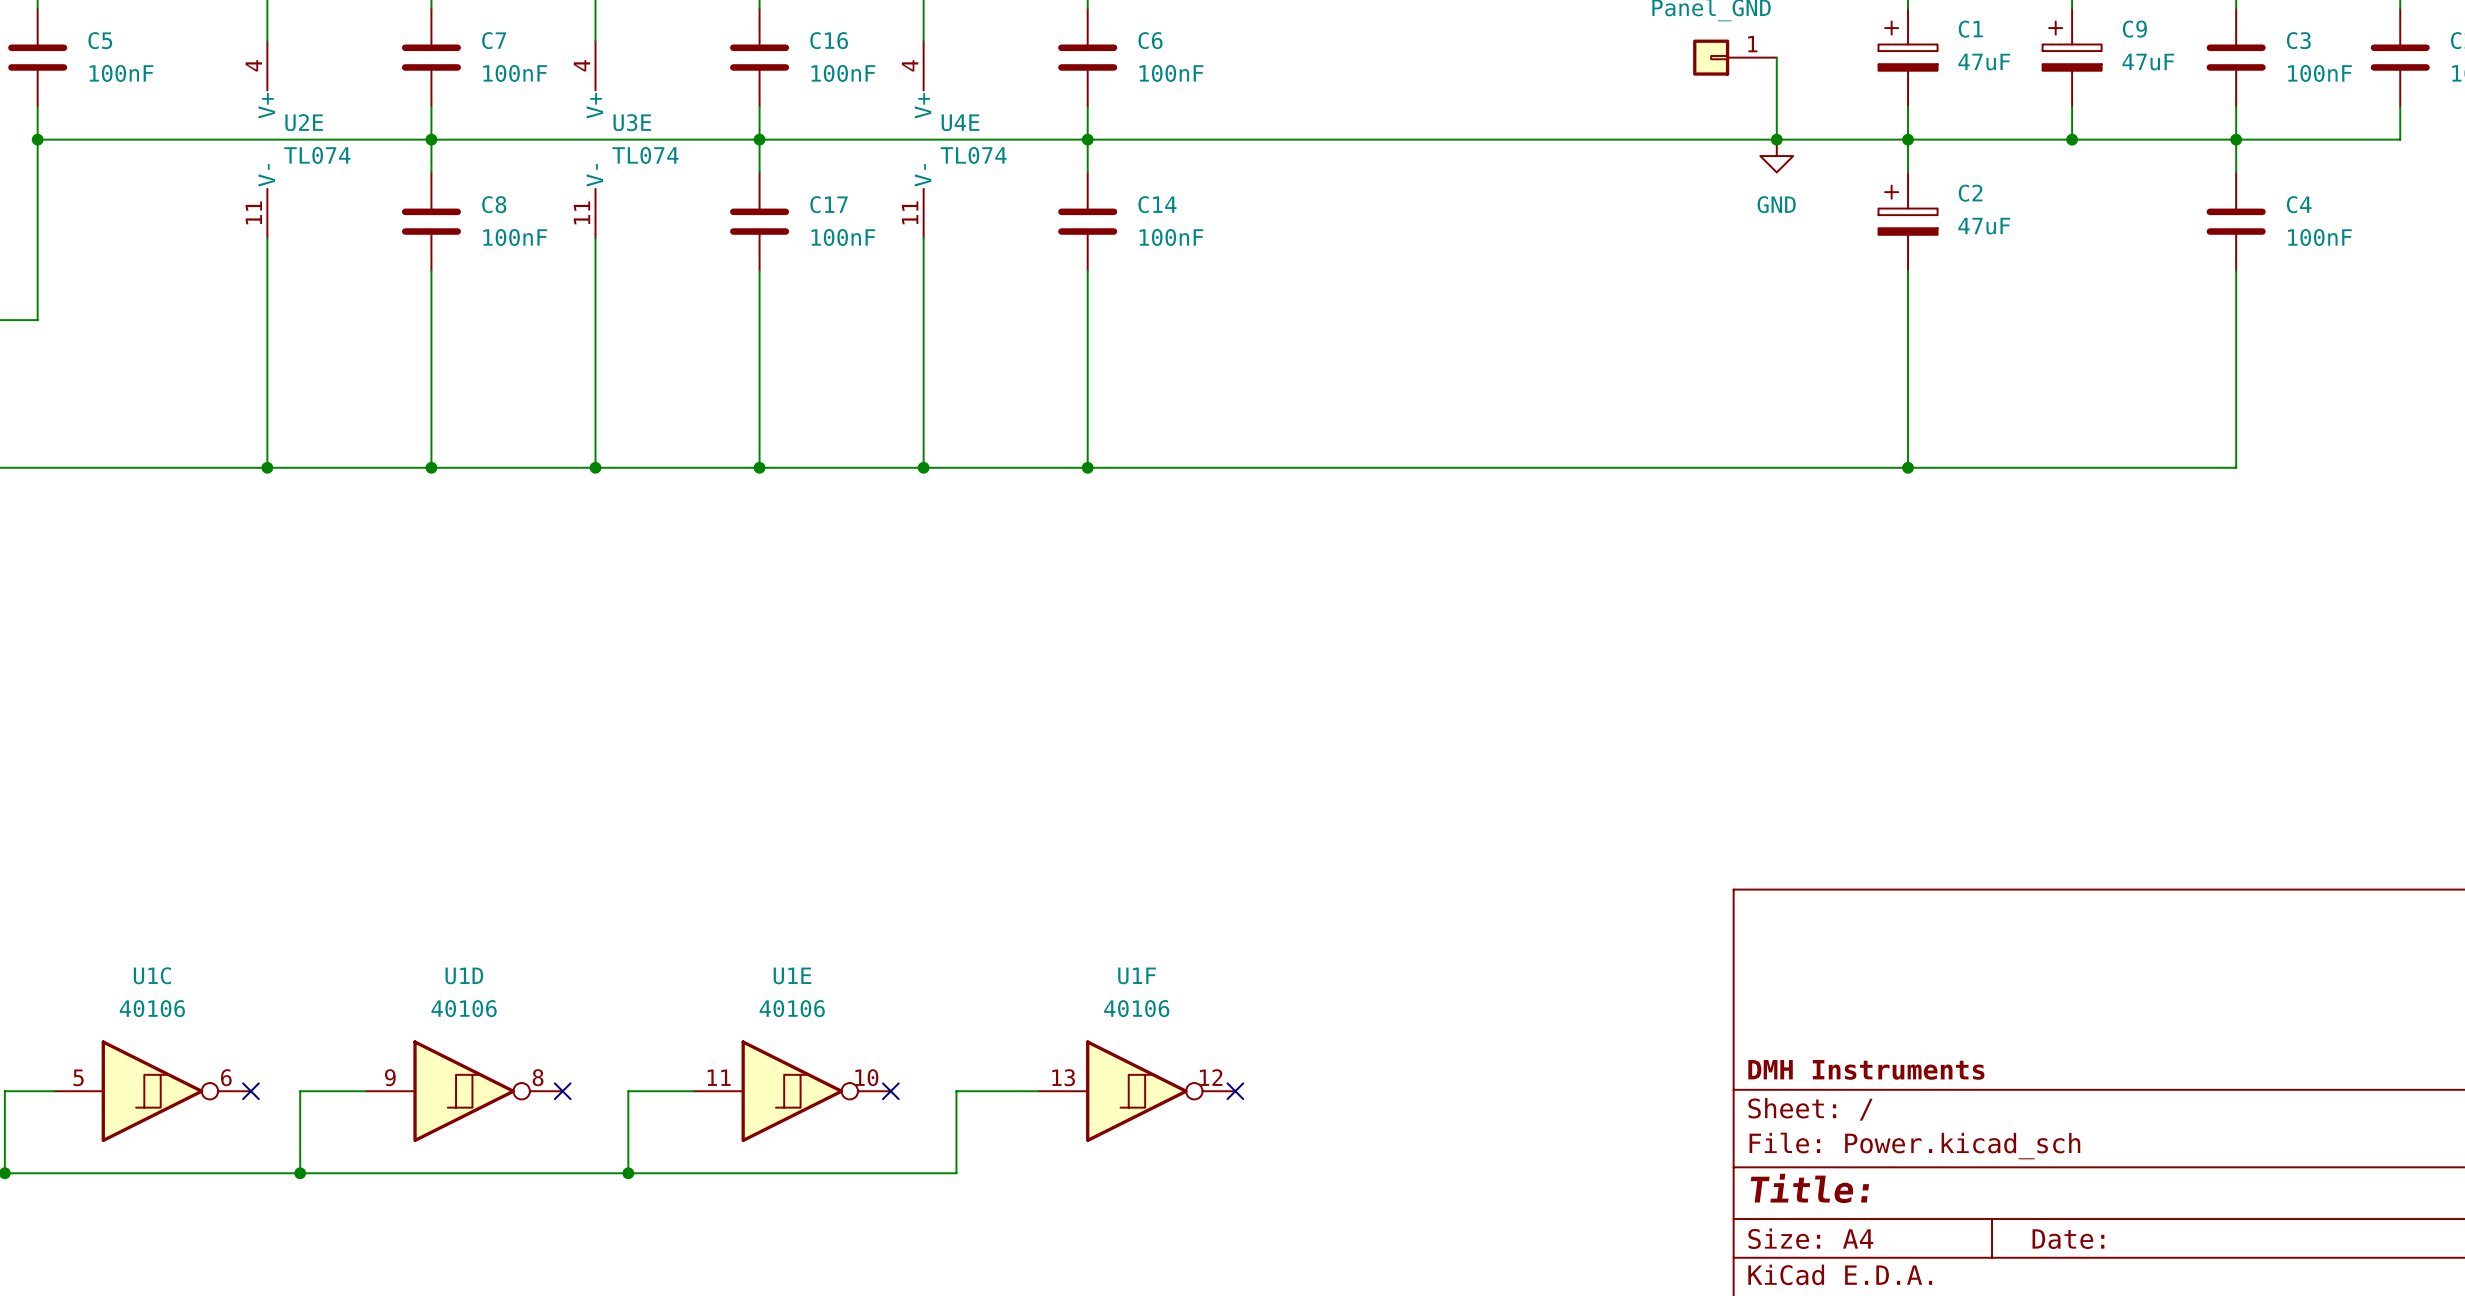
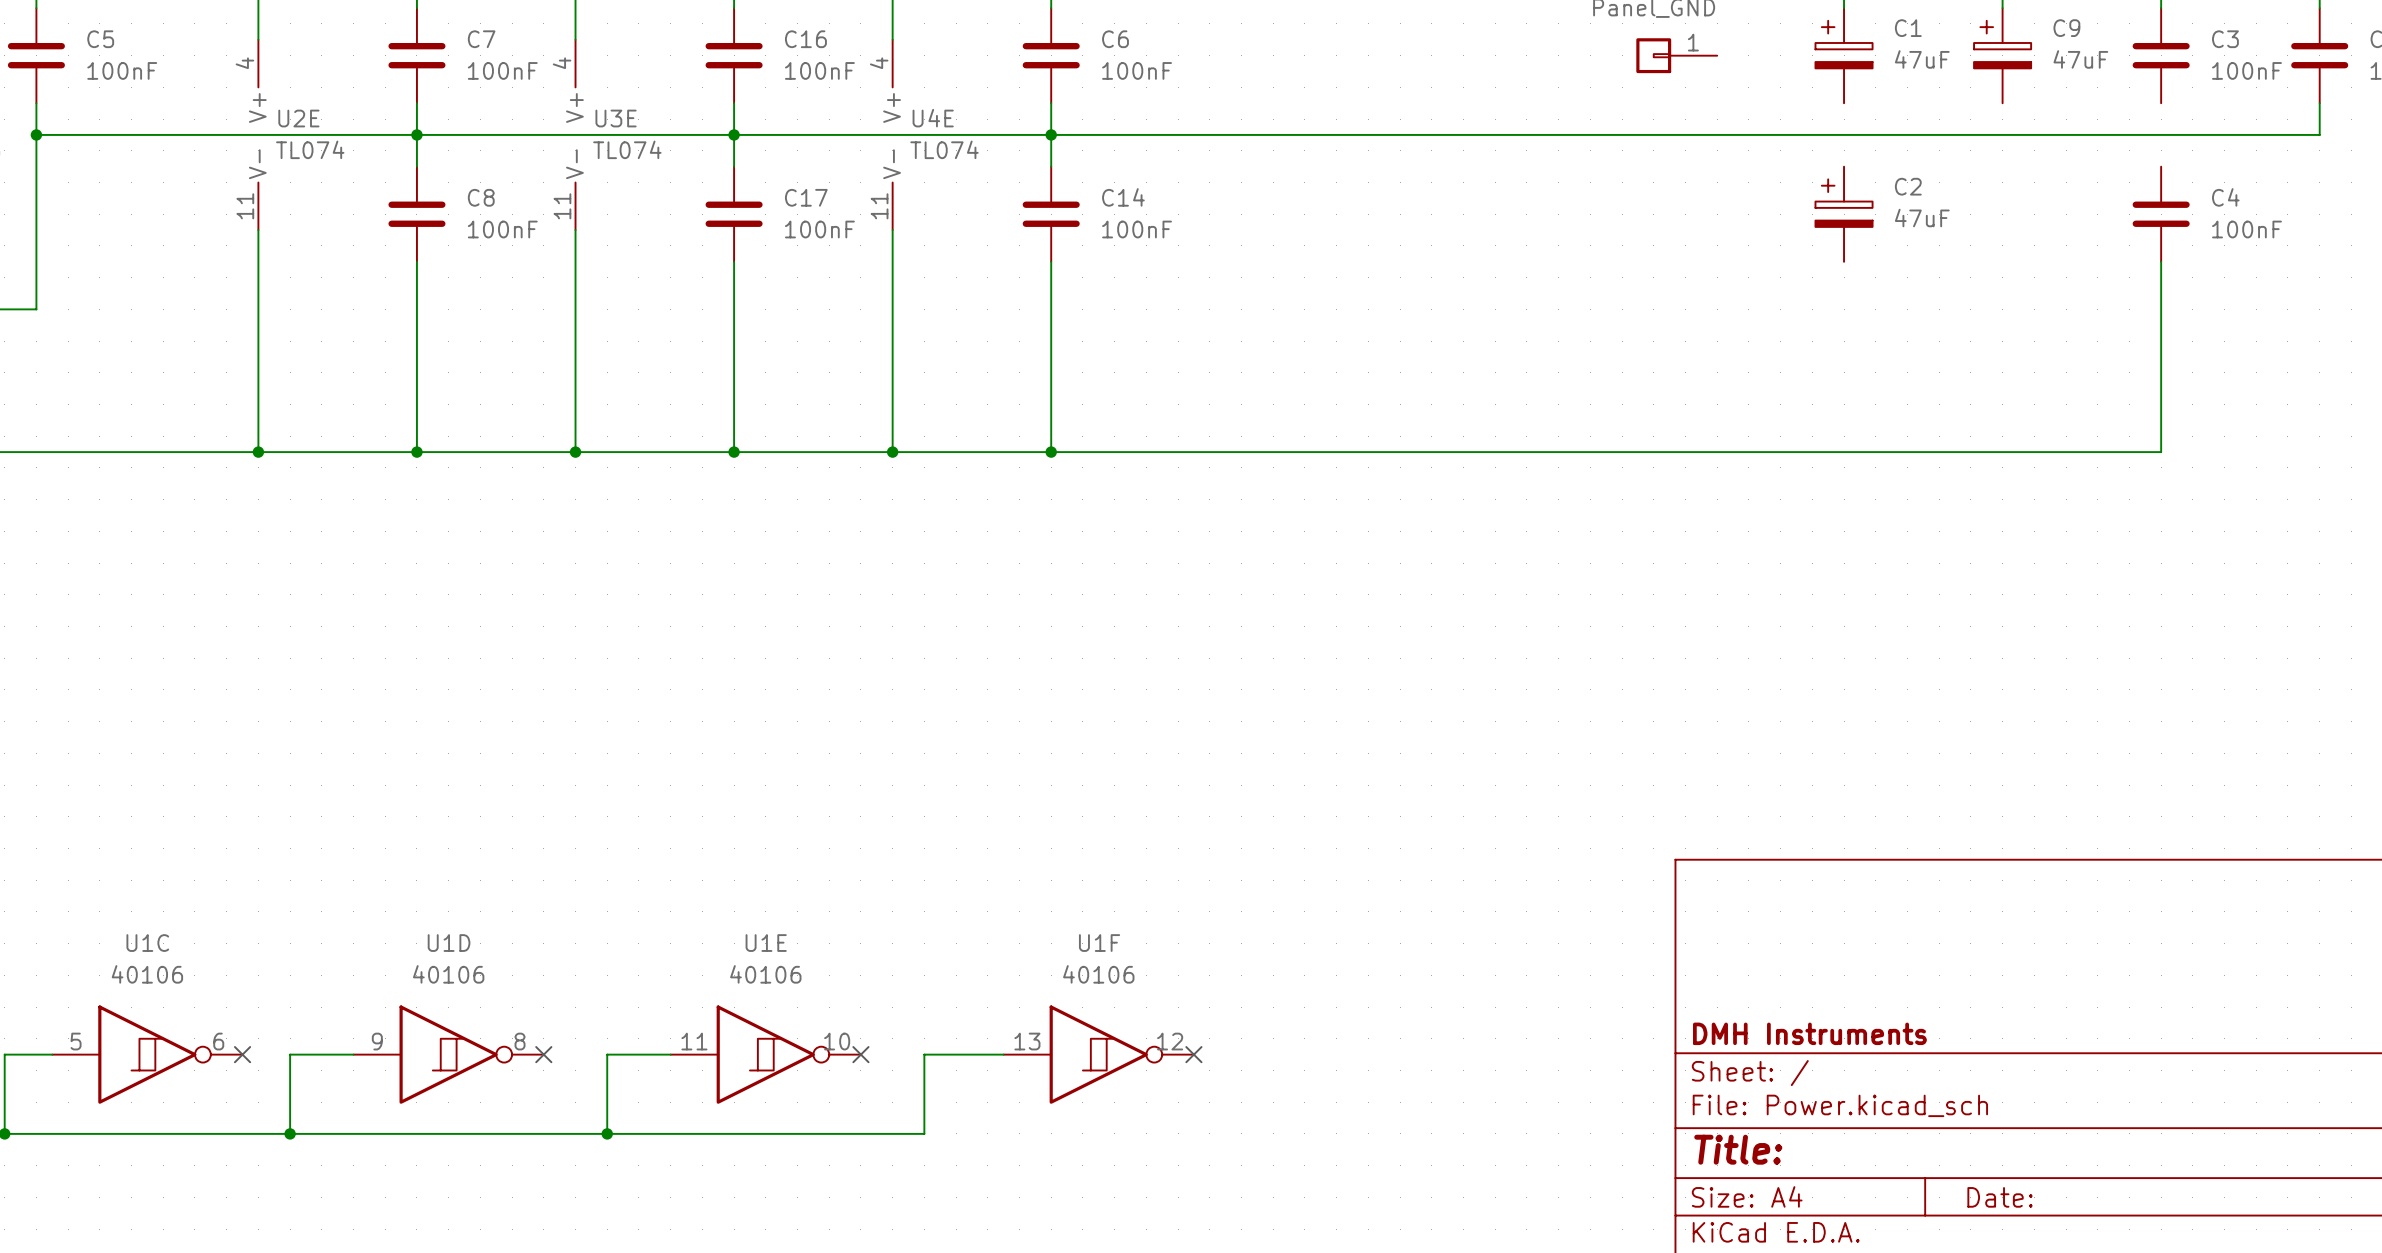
wire: (1776, 57) (1776, 139) -> none
wire: (1908, 106) (1908, 172) -> none
wire: (2072, 106) (2072, 139) -> none
wire: (2236, 106) (2236, 172) -> none
junction: (1776, 139) -> none
junction: (1908, 139) -> none
junction: (2072, 139) -> none
junction: (2236, 139) -> none
power symbol: GND (1776, 156) -> none
wire: (1908, 270) (1908, 467) -> none
junction: (1908, 467) -> none

